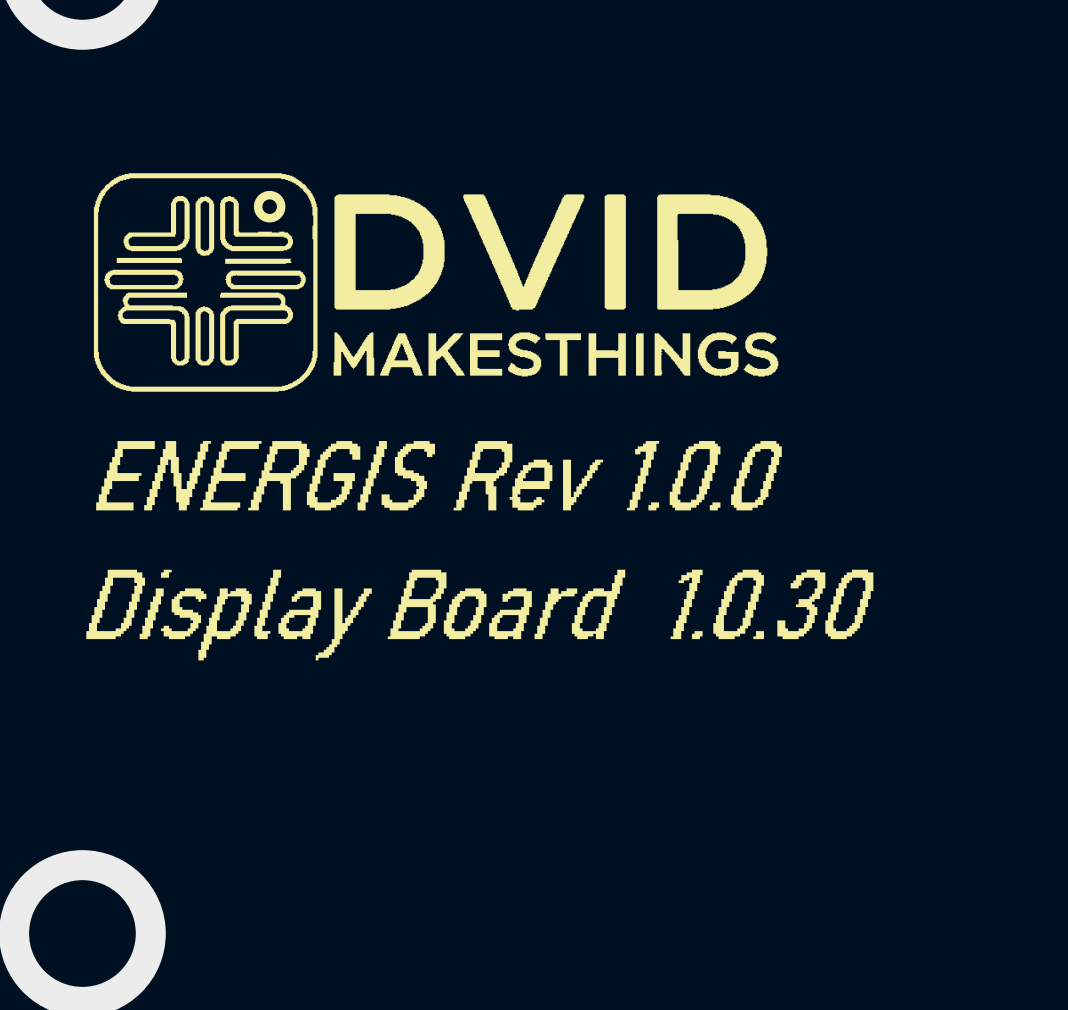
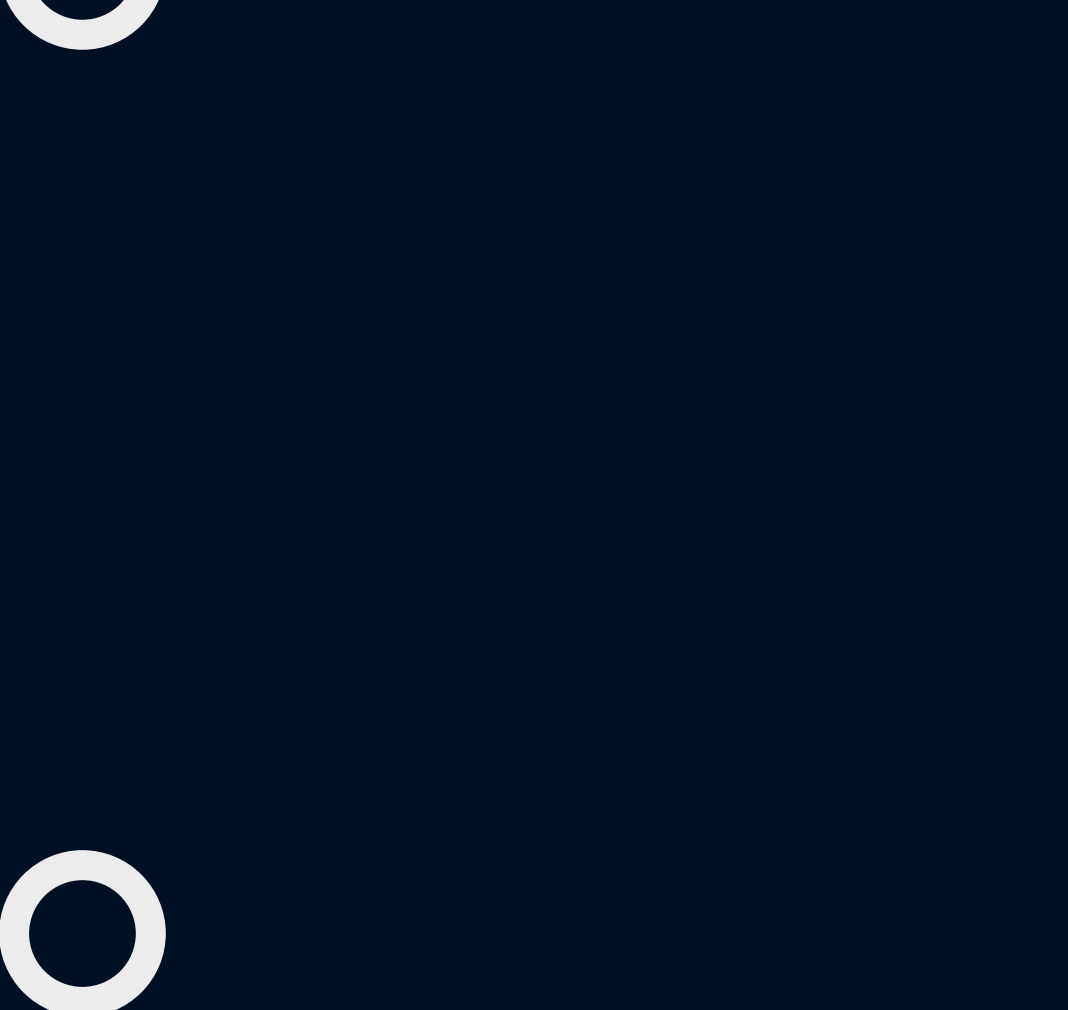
drawing: [93, 173, 779, 392] -> none
drawing: [96, 441, 782, 511] -> none
drawing: [86, 569, 626, 661] -> none
drawing: [670, 569, 874, 640] -> none

